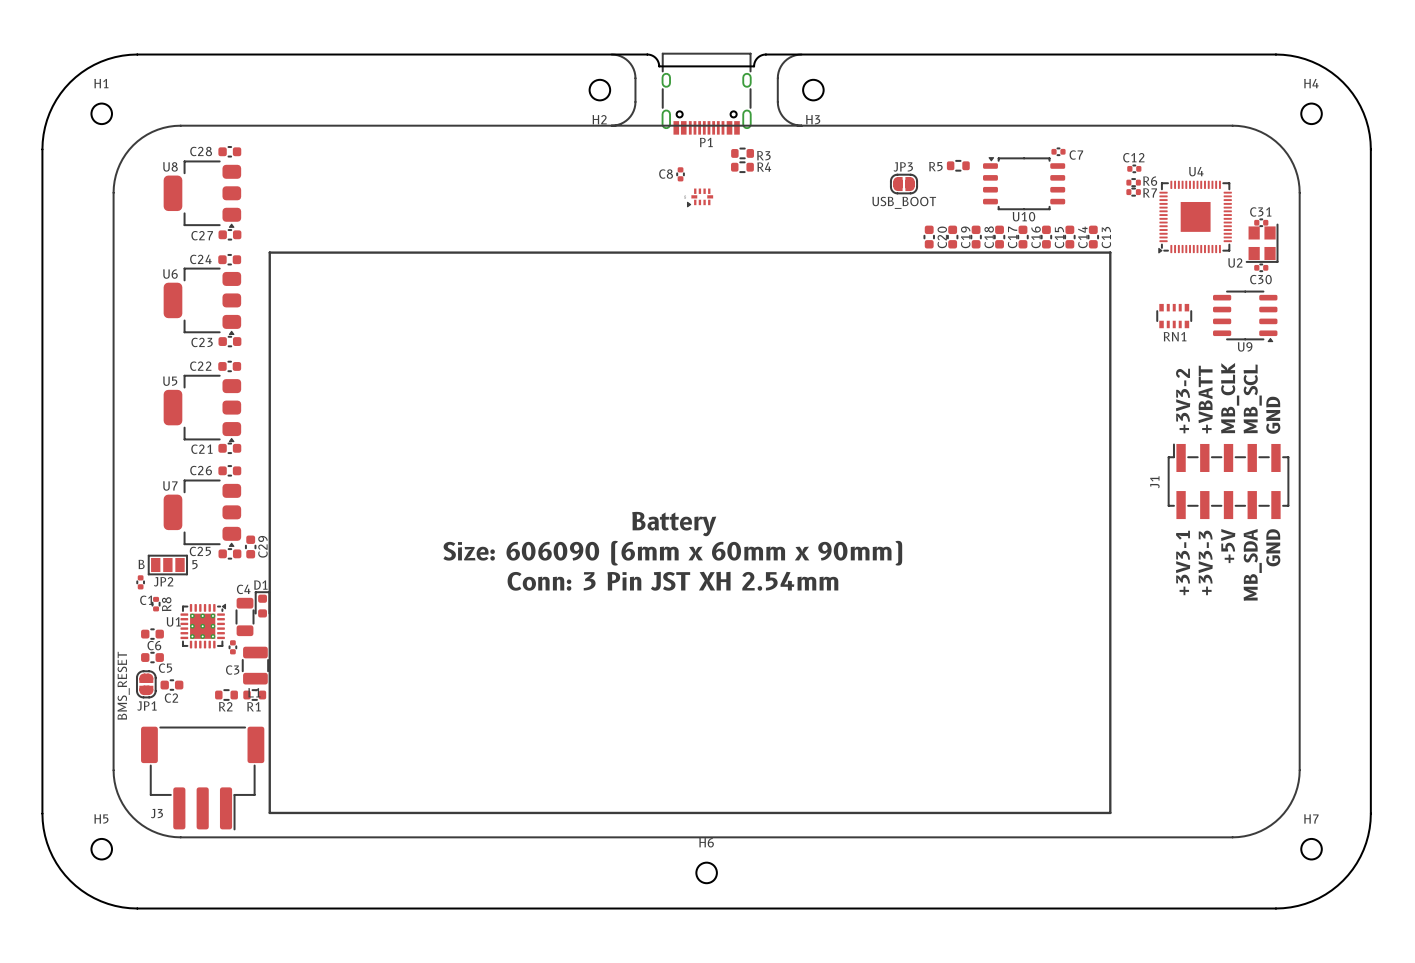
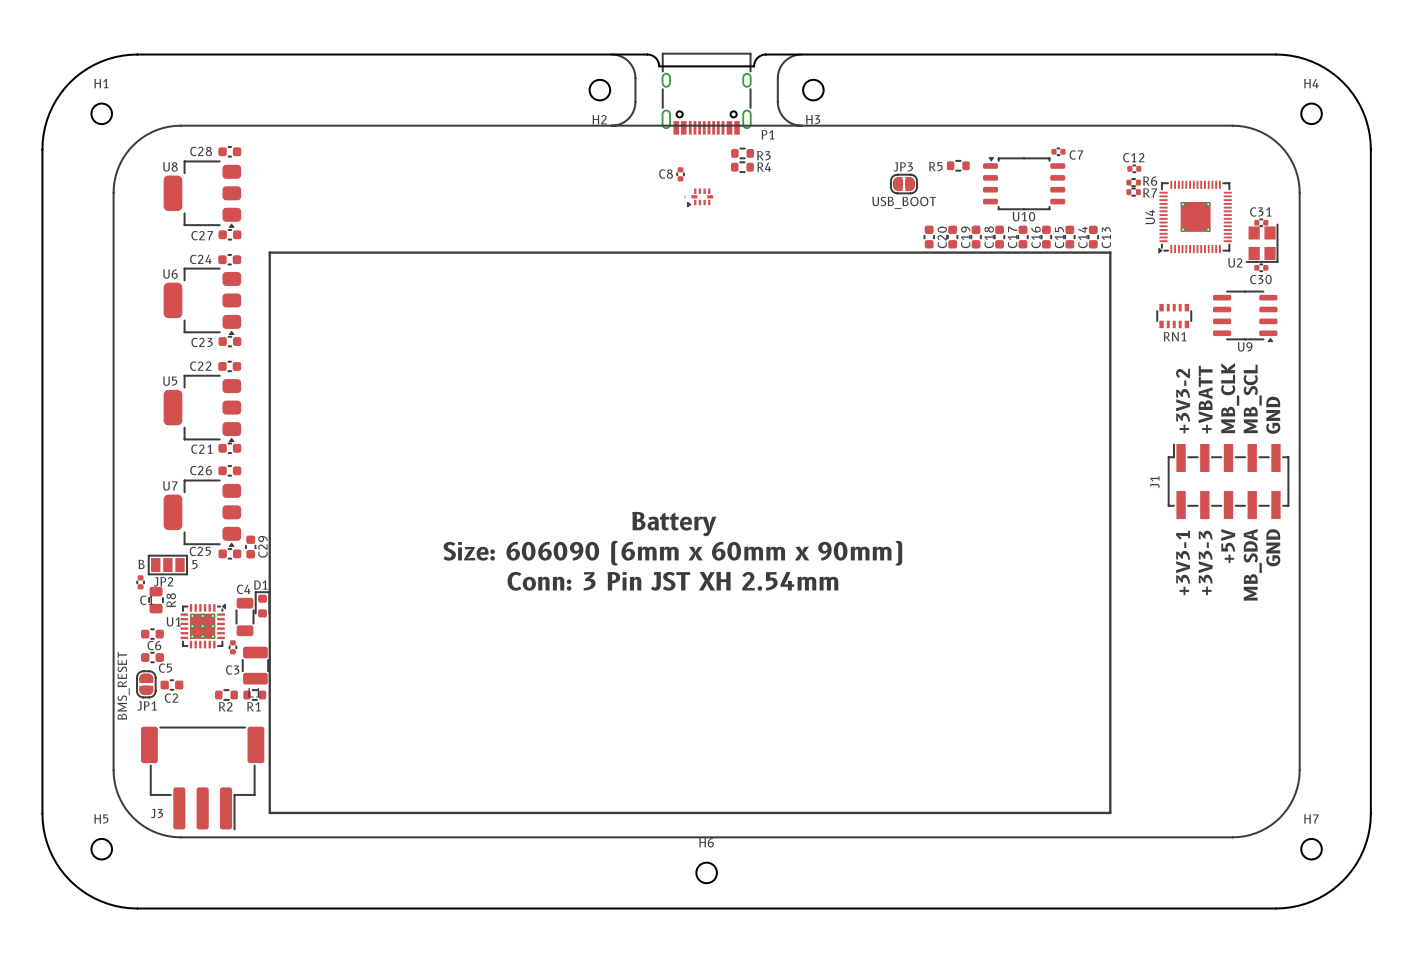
P1 name position: P1 (706, 142) -> P1 (768, 134)
U4 name position: U4 (1196, 171) -> U4 (1150, 217)
U4 footprint: [1158, 180, 1232, 254] -> [1158, 180, 1232, 254]
R8 footprint: [151, 596, 161, 612] -> [148, 586, 164, 614]

